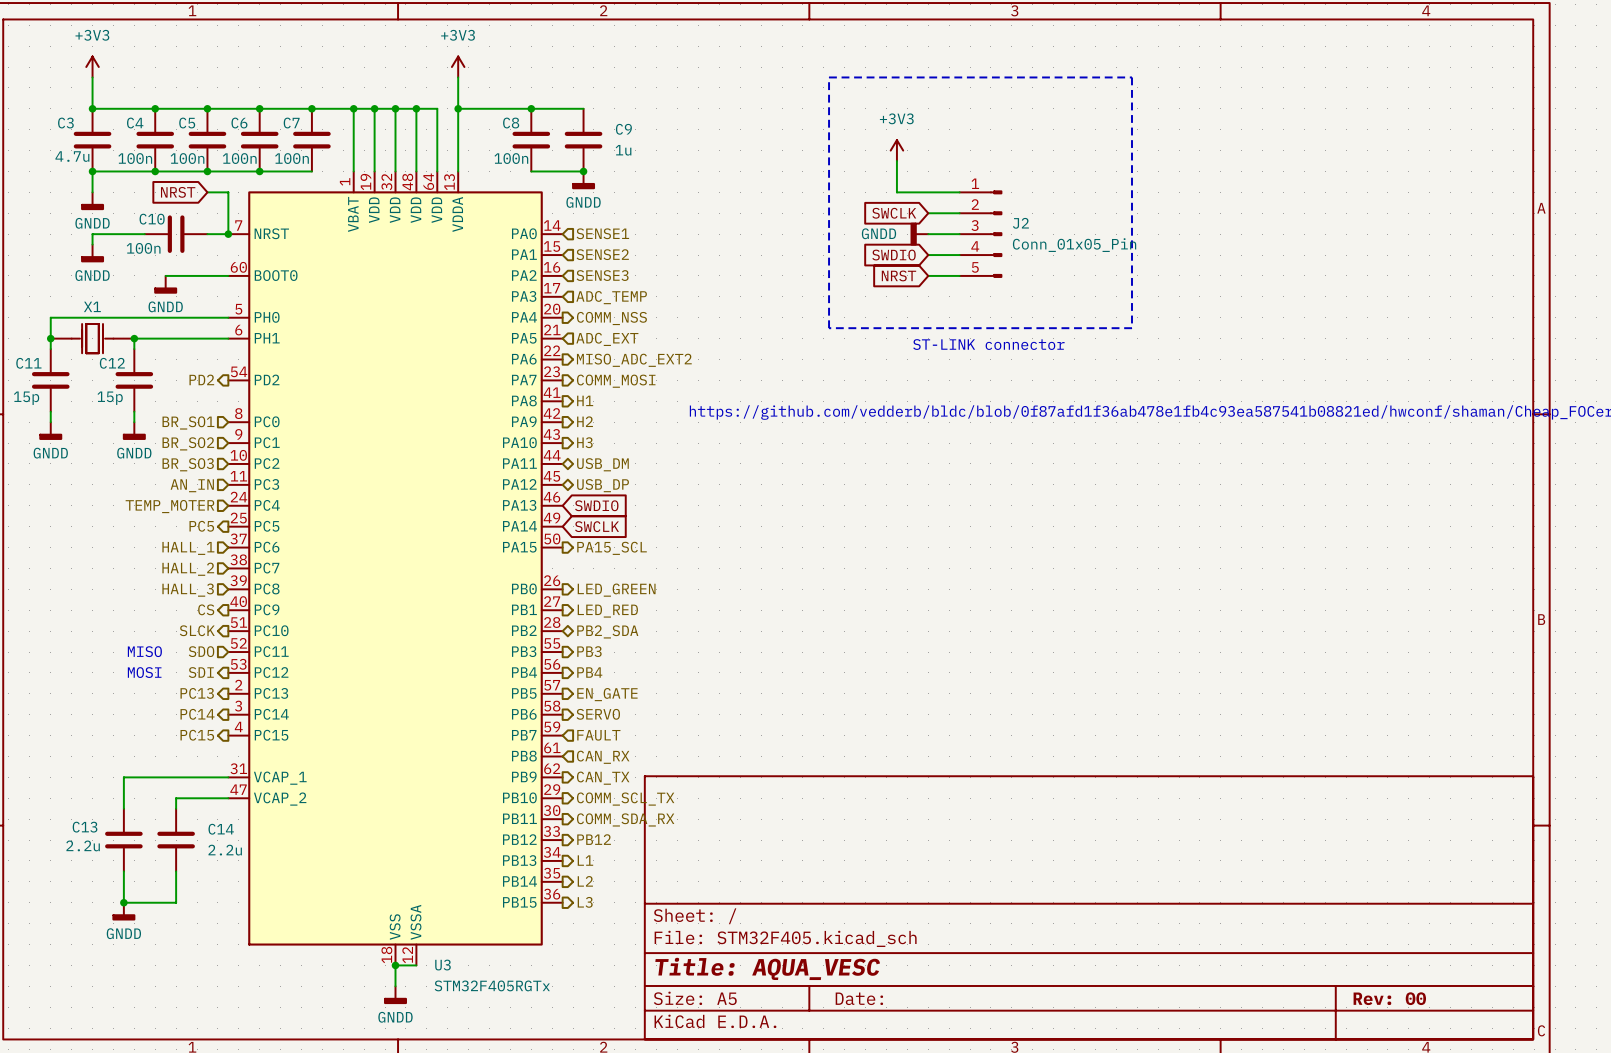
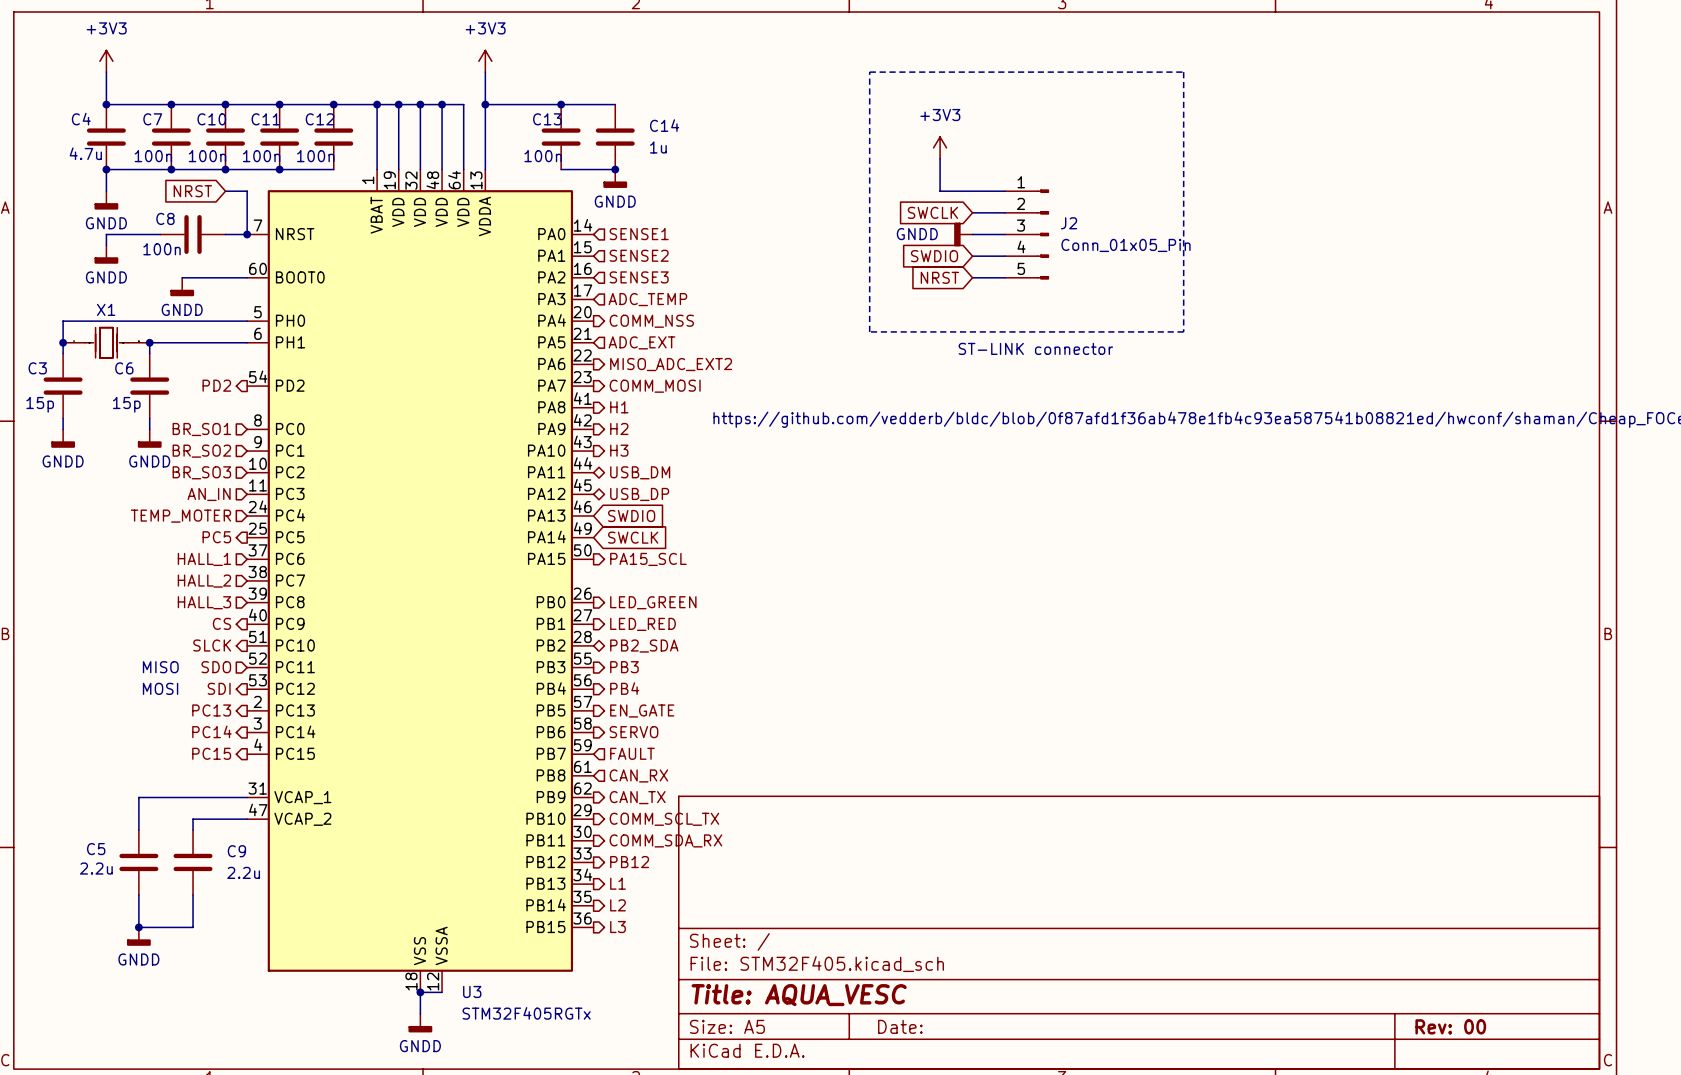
C3 name: C3 (65, 123) -> C4 (81, 119)
C4 name: C4 (135, 123) -> C7 (152, 119)
C5 name: C5 (187, 123) -> C10 (211, 119)
C6 name: C6 (239, 123) -> C11 (265, 119)
C7 name: C7 (291, 123) -> C12 (320, 119)
C8 name: C8 (511, 123) -> C13 (547, 119)
C9 name: C9 (623, 129) -> C14 (664, 125)
C10 name: C10 (152, 219) -> C8 (165, 218)
C11 name: C11 (28, 363) -> C3 (37, 368)
C12 name: C12 (112, 363) -> C6 (124, 368)
C13 name: C13 (85, 827) -> C5 (96, 849)
C14 name: C14 (221, 829) -> C9 (236, 851)

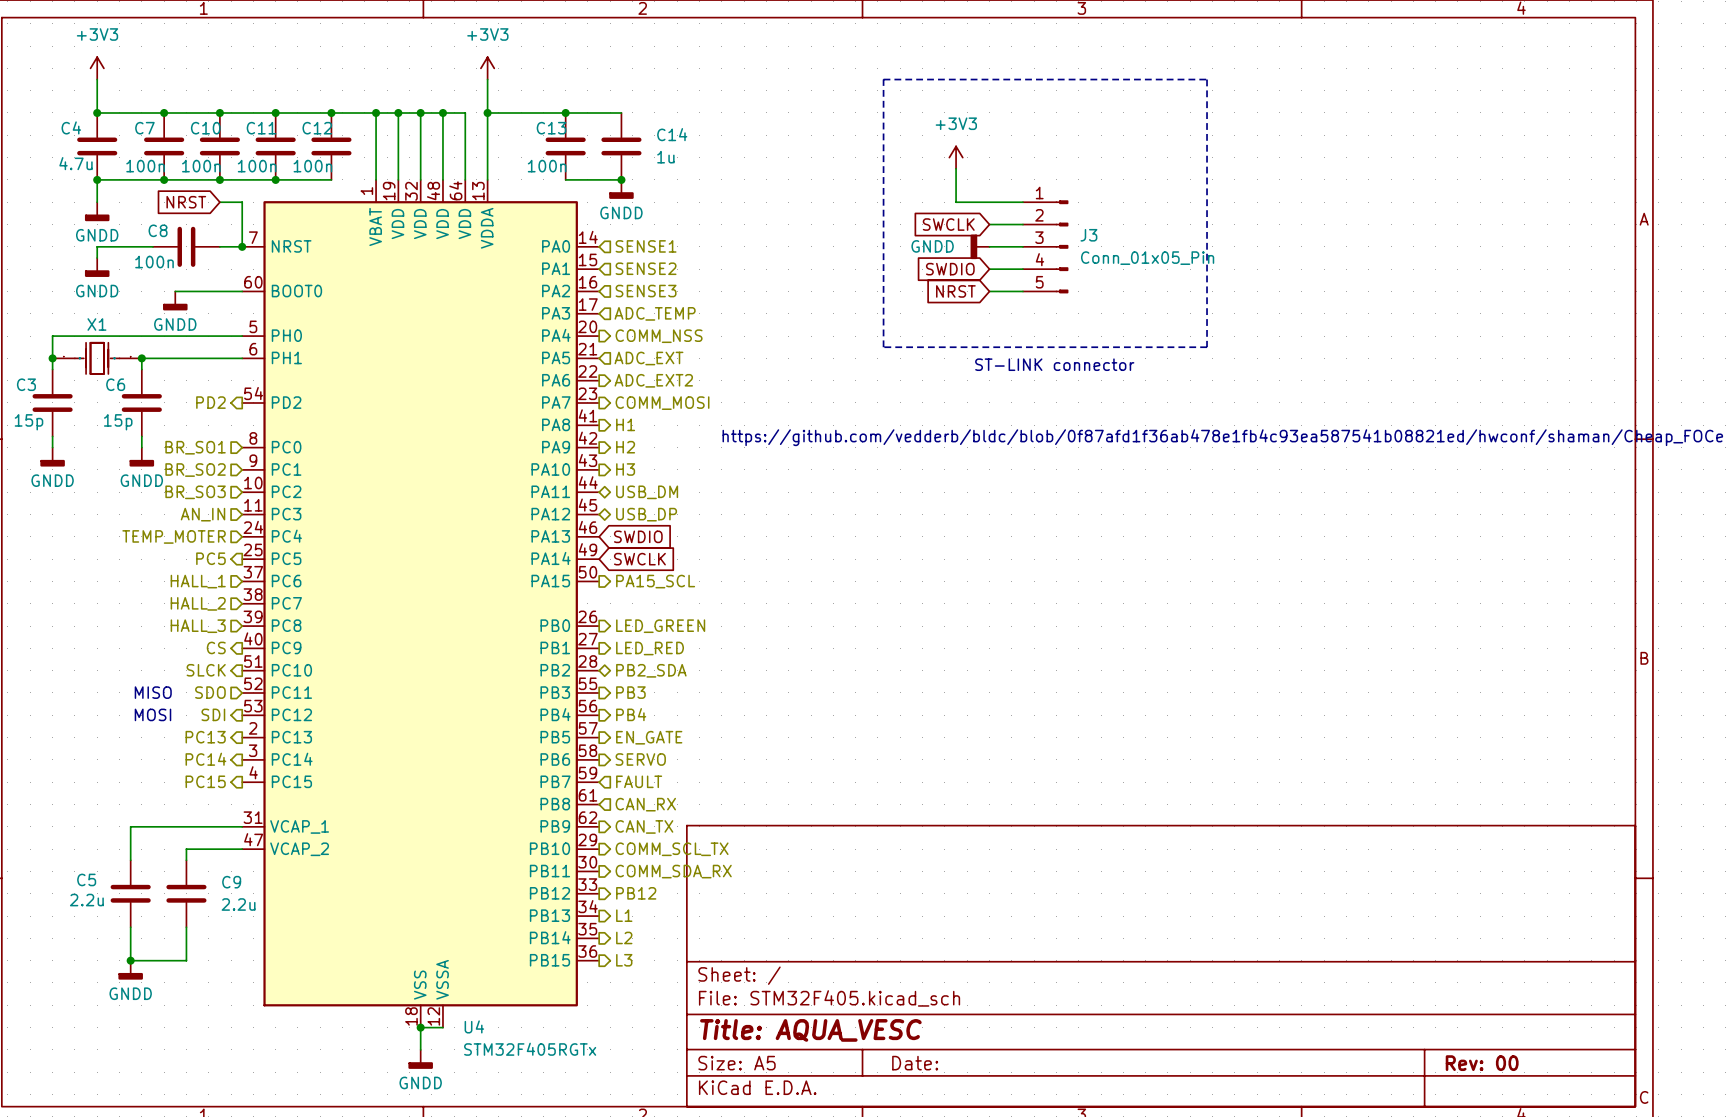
J2 name: J2 (1069, 223) -> J3 (1088, 235)
hierarchical label: MISO_ADC_EXT2 (671, 364) -> ADC_EXT2 (653, 380)
U3 name: U3 (472, 991) -> U4 (474, 1026)

